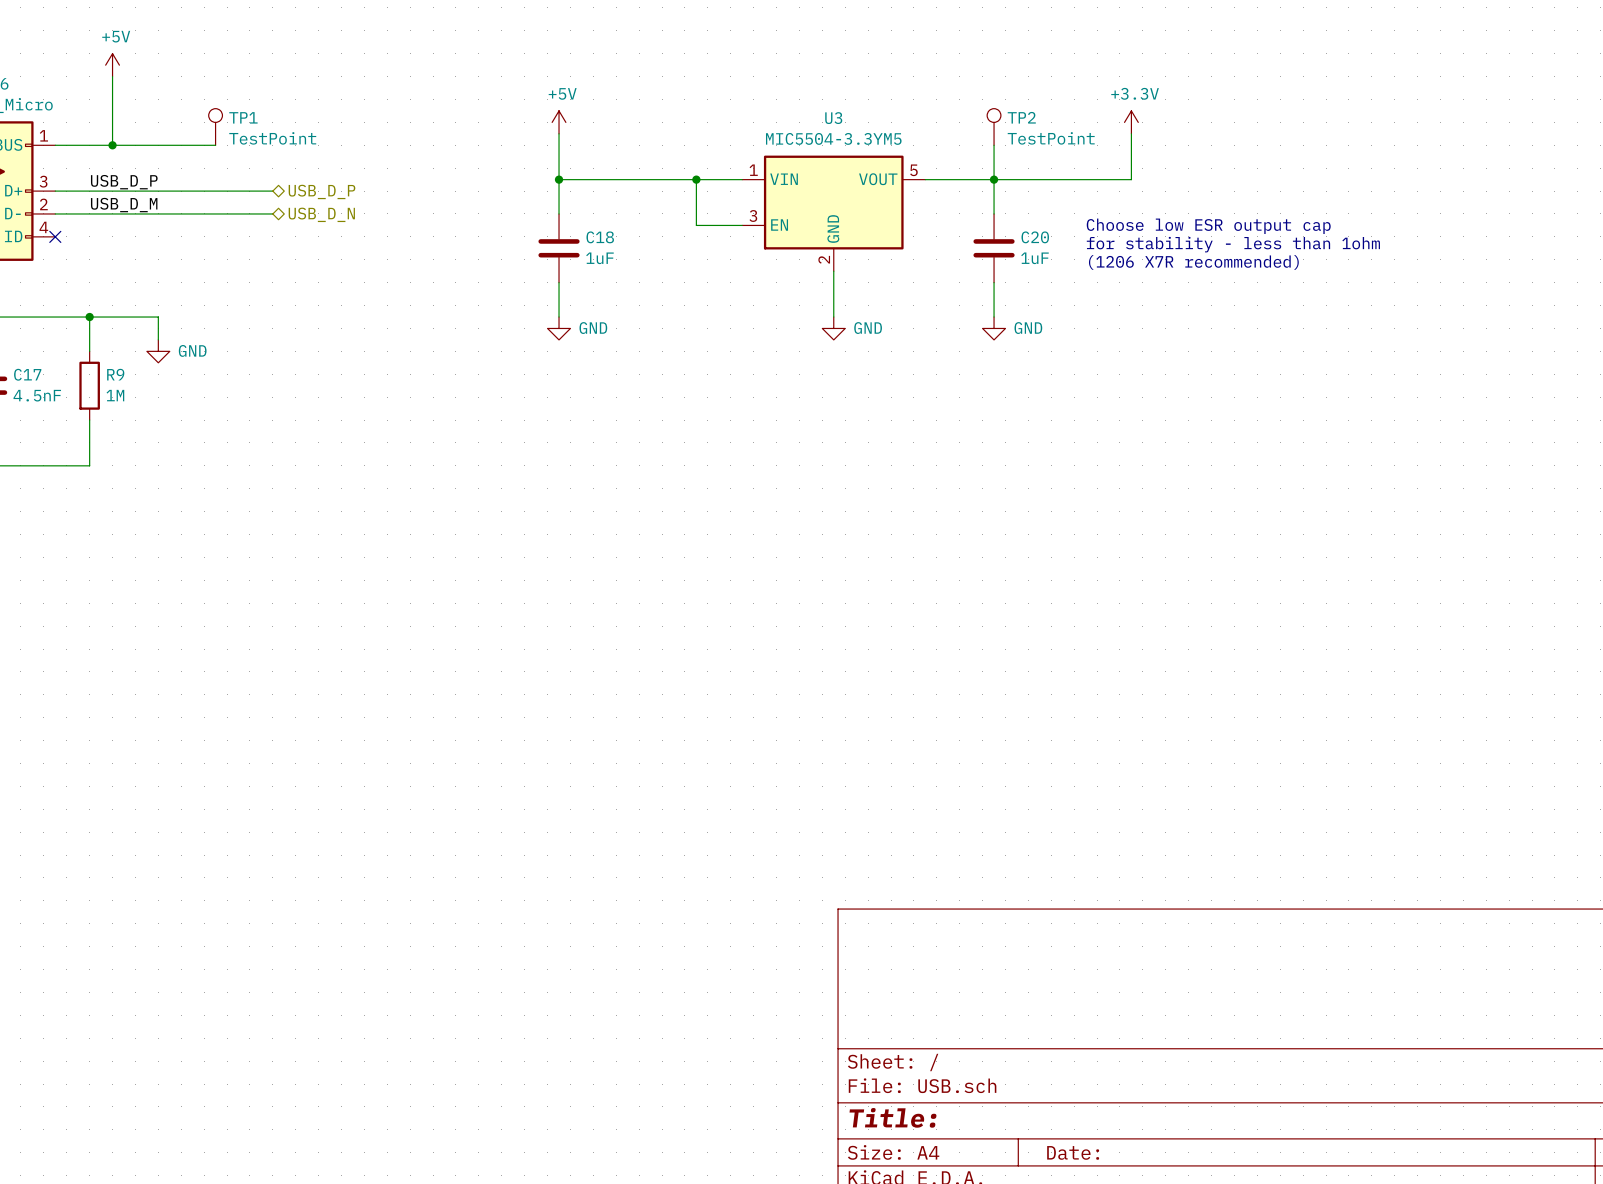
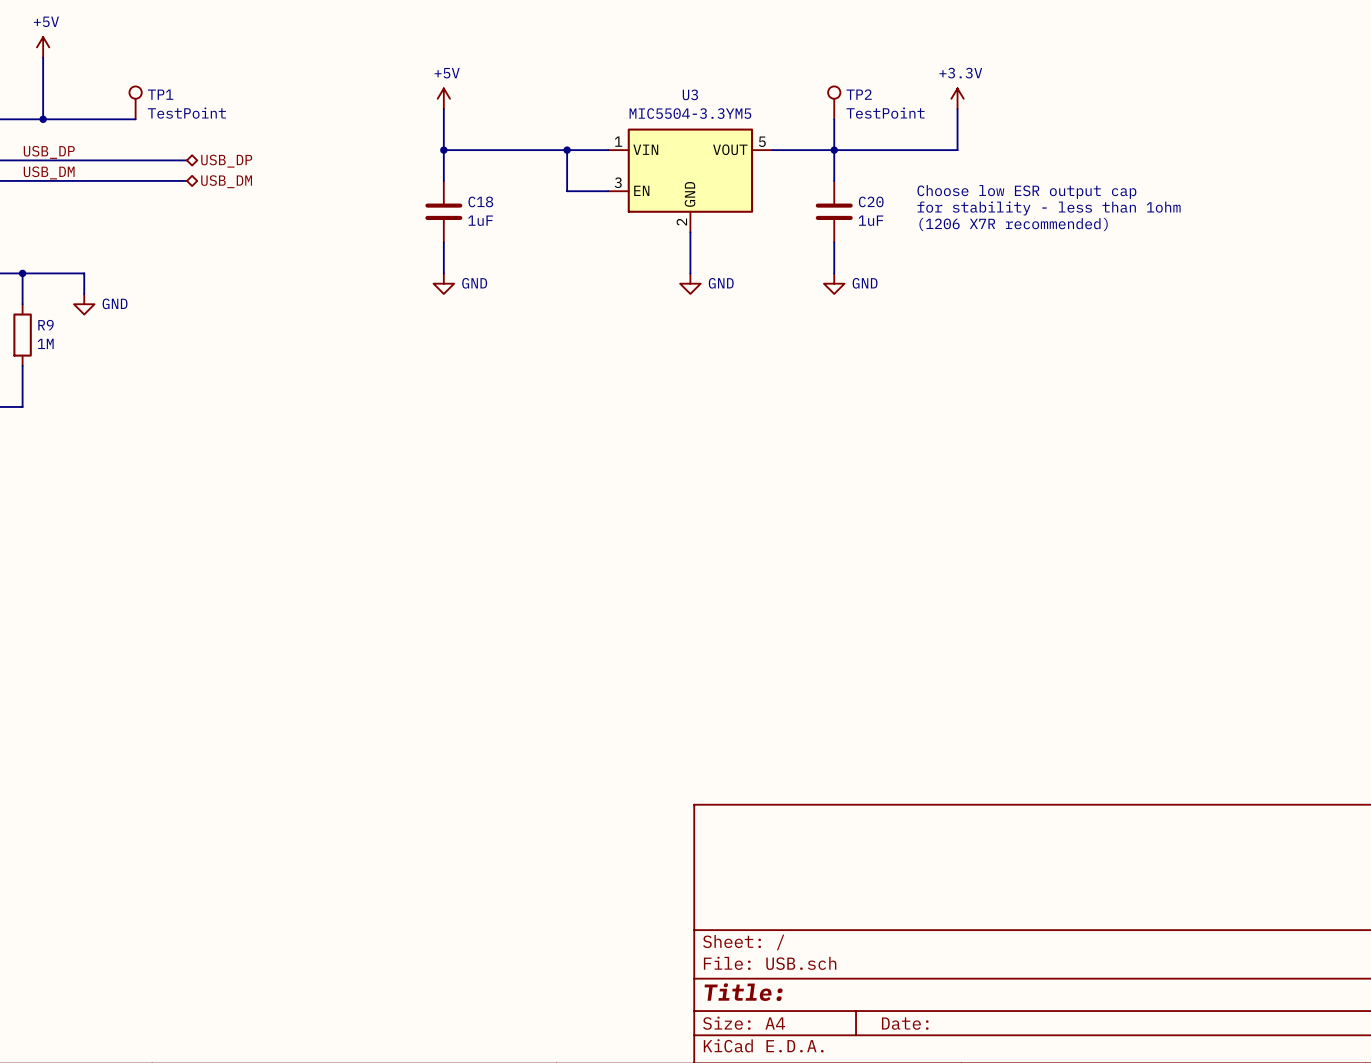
label: USB_D_P (124, 182) -> USB_DP (49, 152)
hierarchical label: USB_D_P (321, 191) -> USB_DP (226, 161)
label: USB_D_M (124, 205) -> USB_DM (49, 172)
hierarchical label: USB_D_N (321, 214) -> USB_DM (226, 181)

